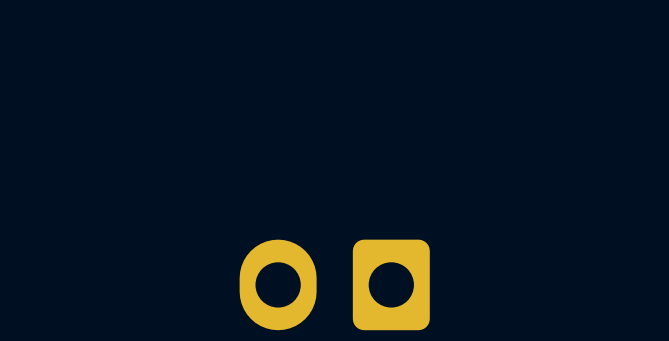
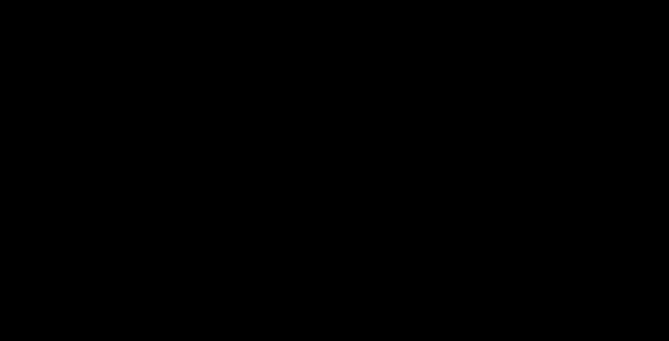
part: (334, 284) -> none

